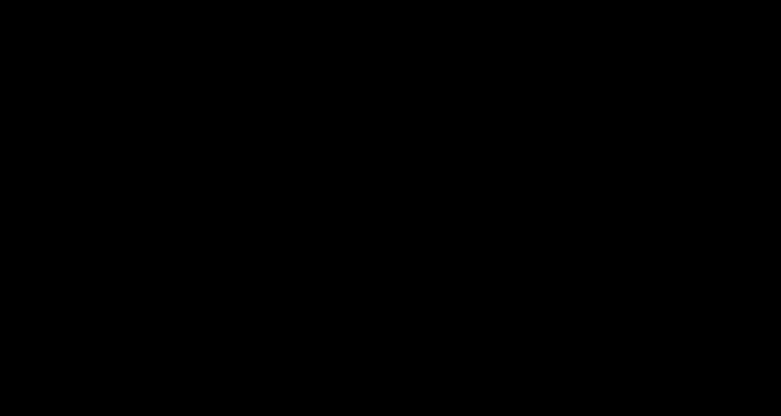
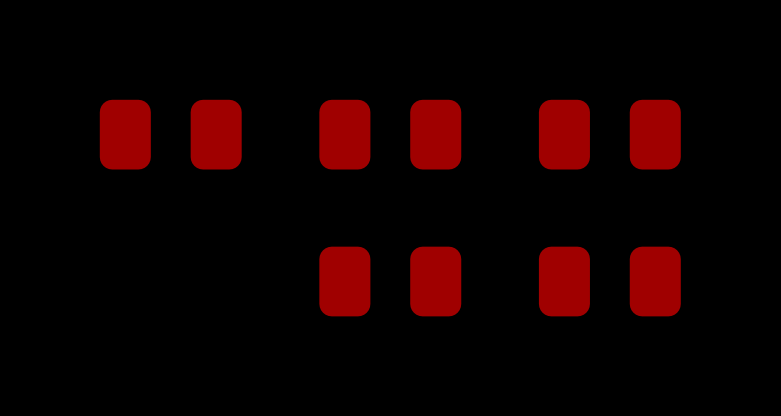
part: none -> (170, 134)
part: none -> (390, 134)
part: none -> (609, 134)
part: none -> (390, 281)
part: none -> (609, 281)

